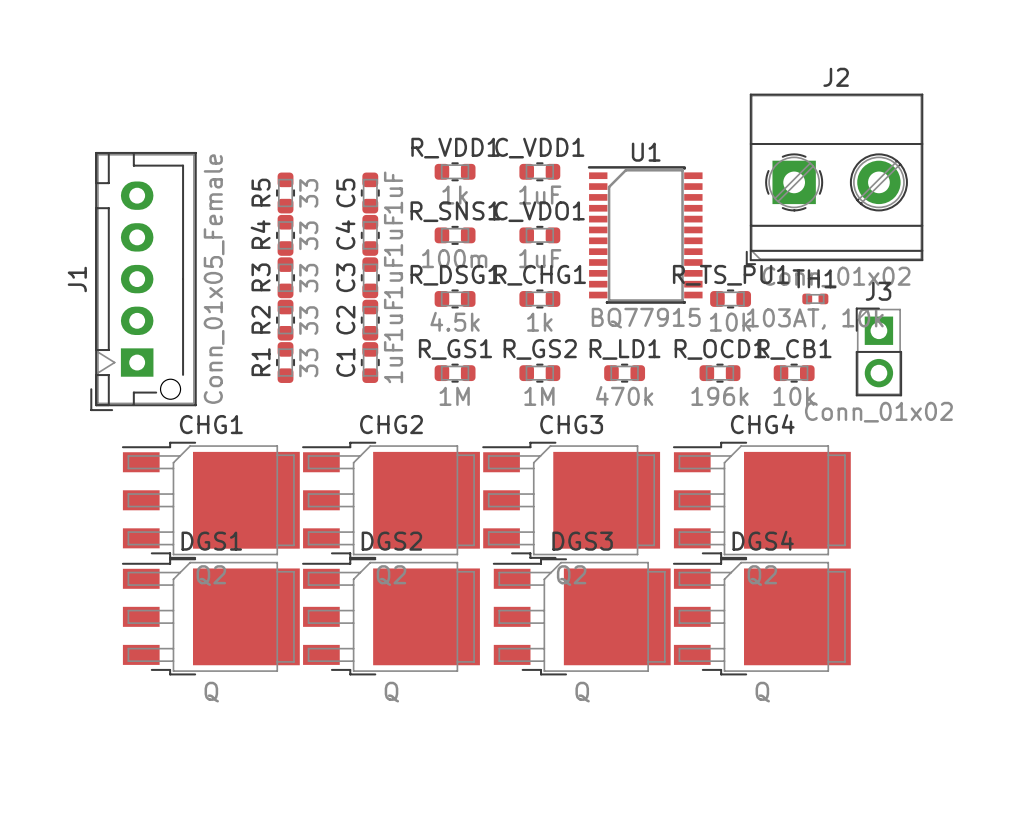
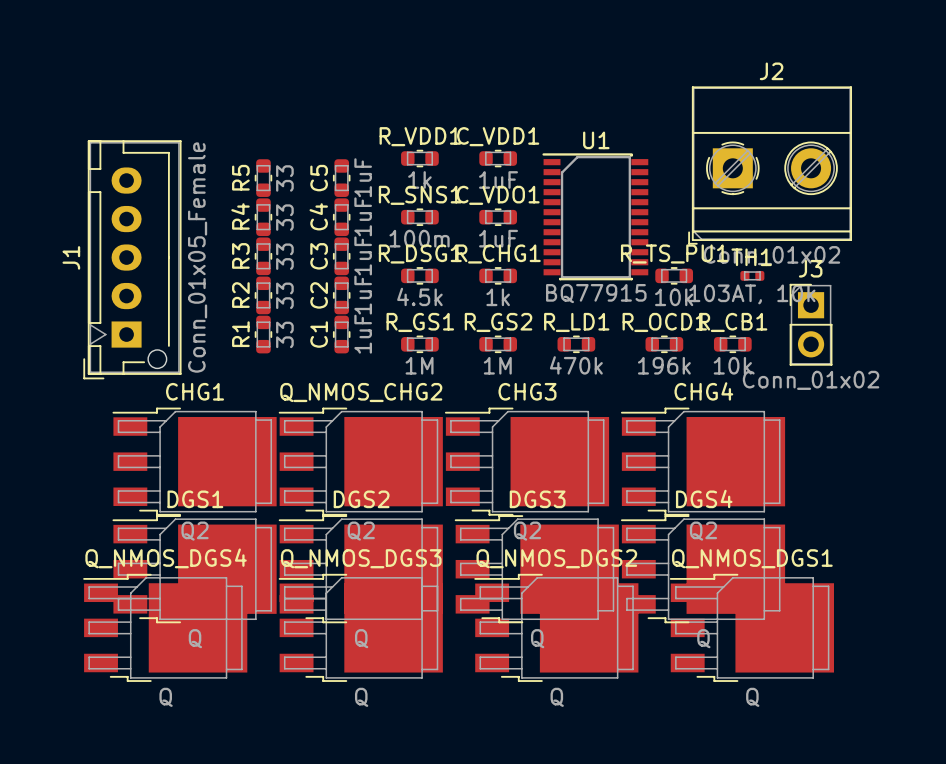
CHG2 name: CHG2 (391, 424) -> Q_NMOS_CHG2 (361, 392)
Q_NMOS_DGS4: none -> Q (165, 627)
Q_NMOS_DGS3: none -> Q (360, 627)
Q_NMOS_DGS2: none -> Q (556, 627)
Q_NMOS_DGS1: none -> Q (751, 627)

